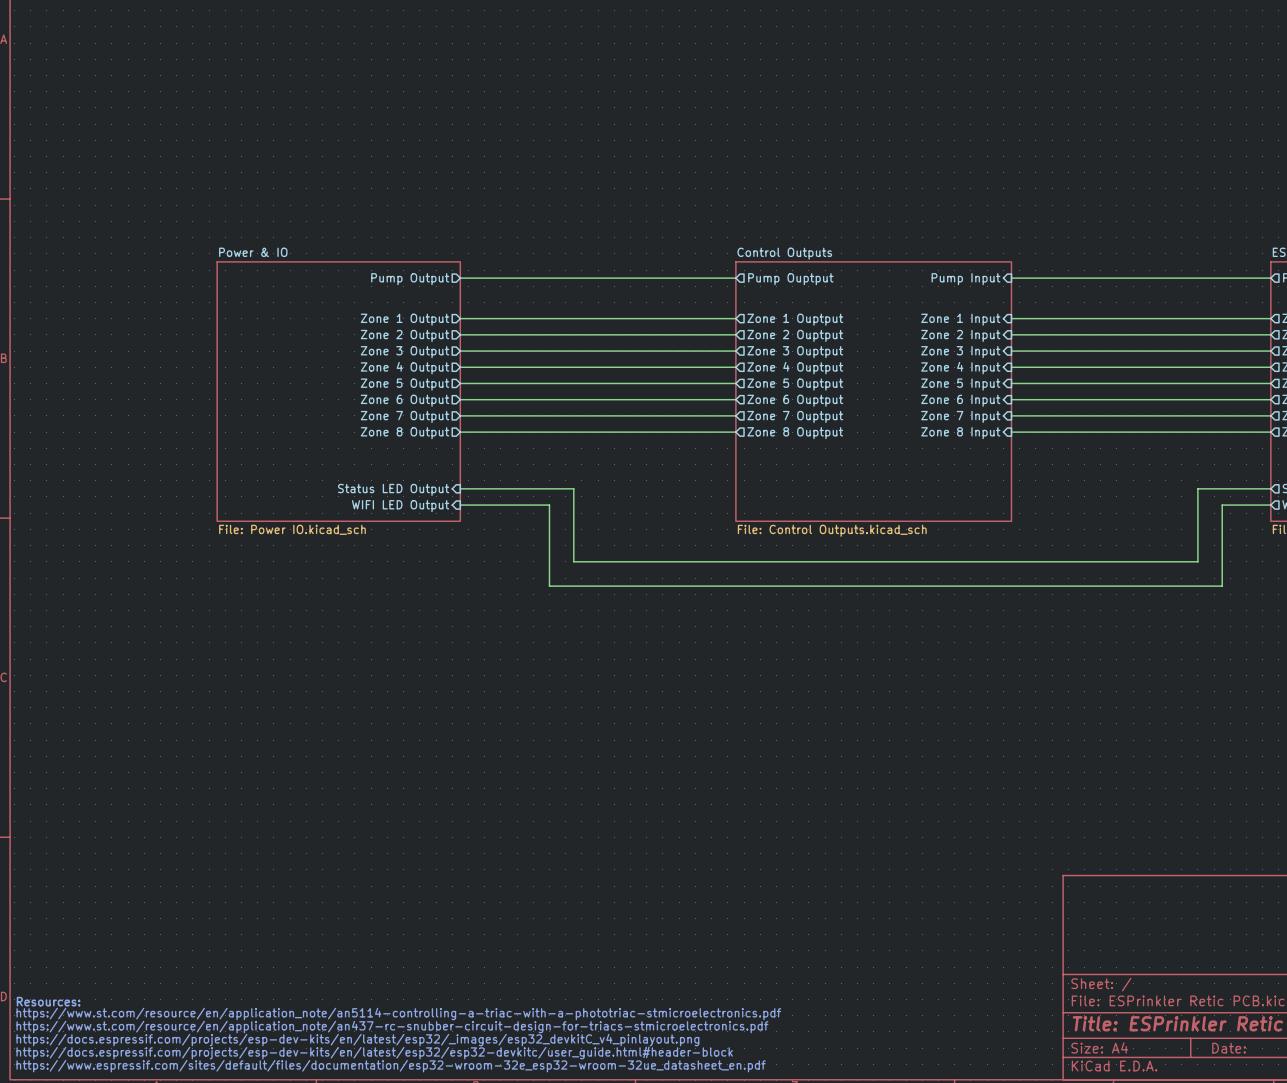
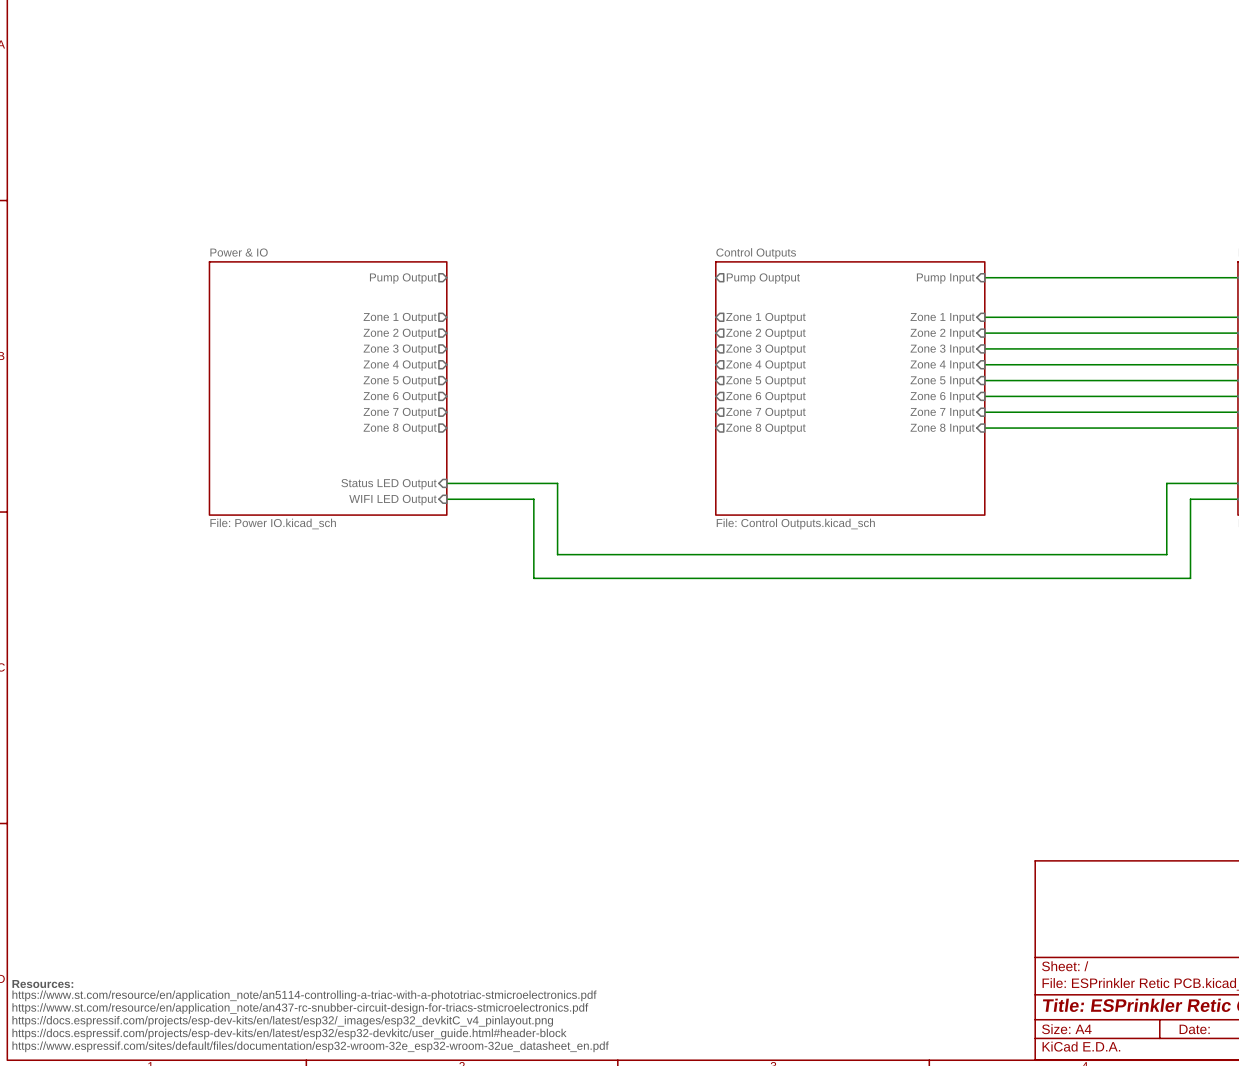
wire: (460, 278) (735, 278) -> none
wire: (460, 318) (735, 318) -> none
wire: (460, 334) (735, 334) -> none
wire: (460, 351) (735, 351) -> none
wire: (460, 367) (735, 367) -> none
wire: (460, 383) (735, 383) -> none
wire: (460, 399) (735, 399) -> none
wire: (460, 415) (735, 415) -> none
wire: (460, 432) (735, 432) -> none

